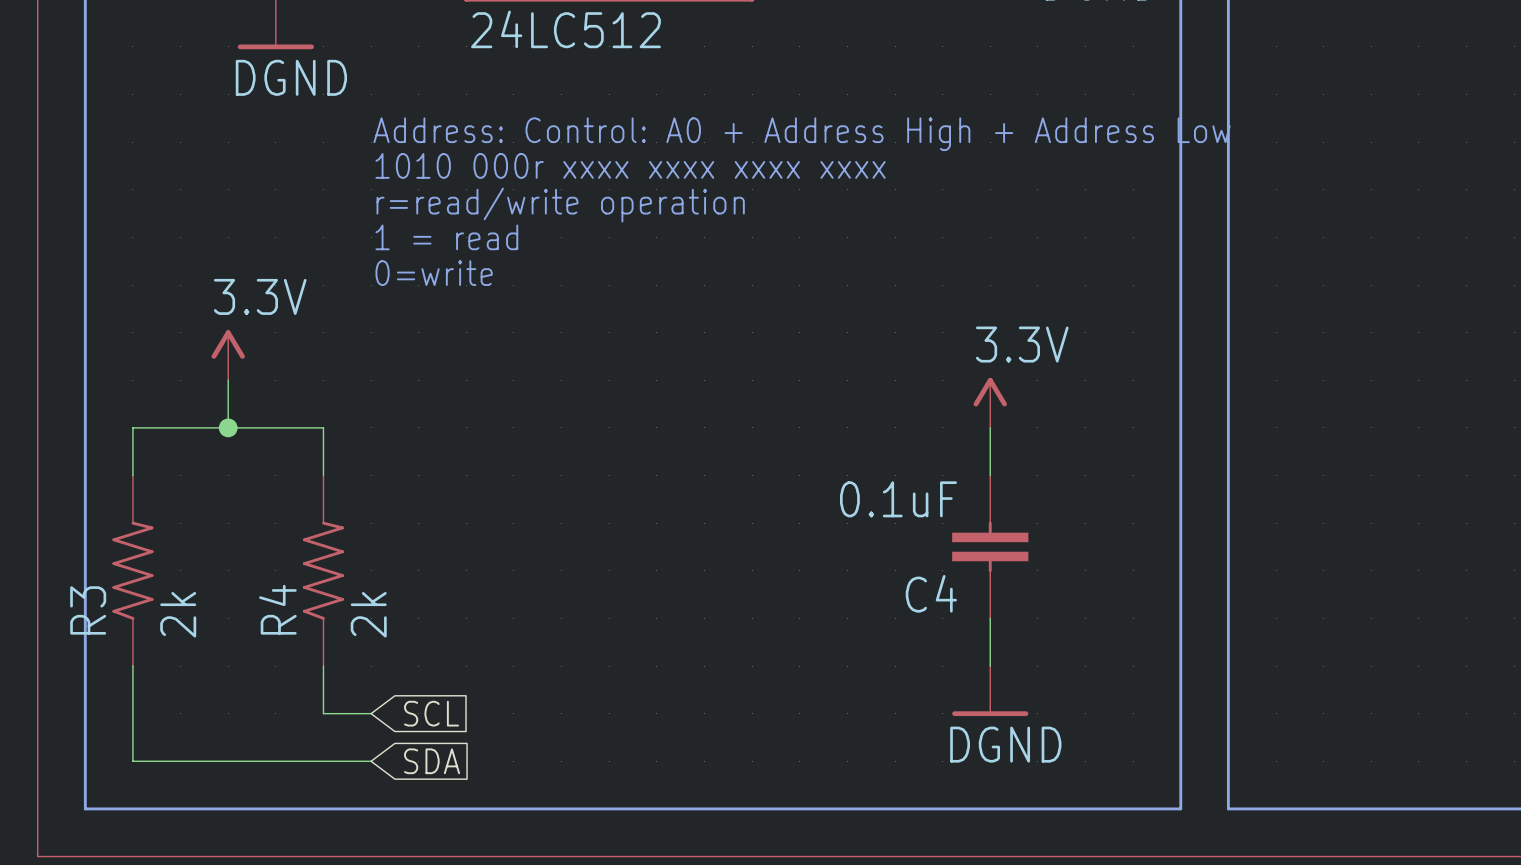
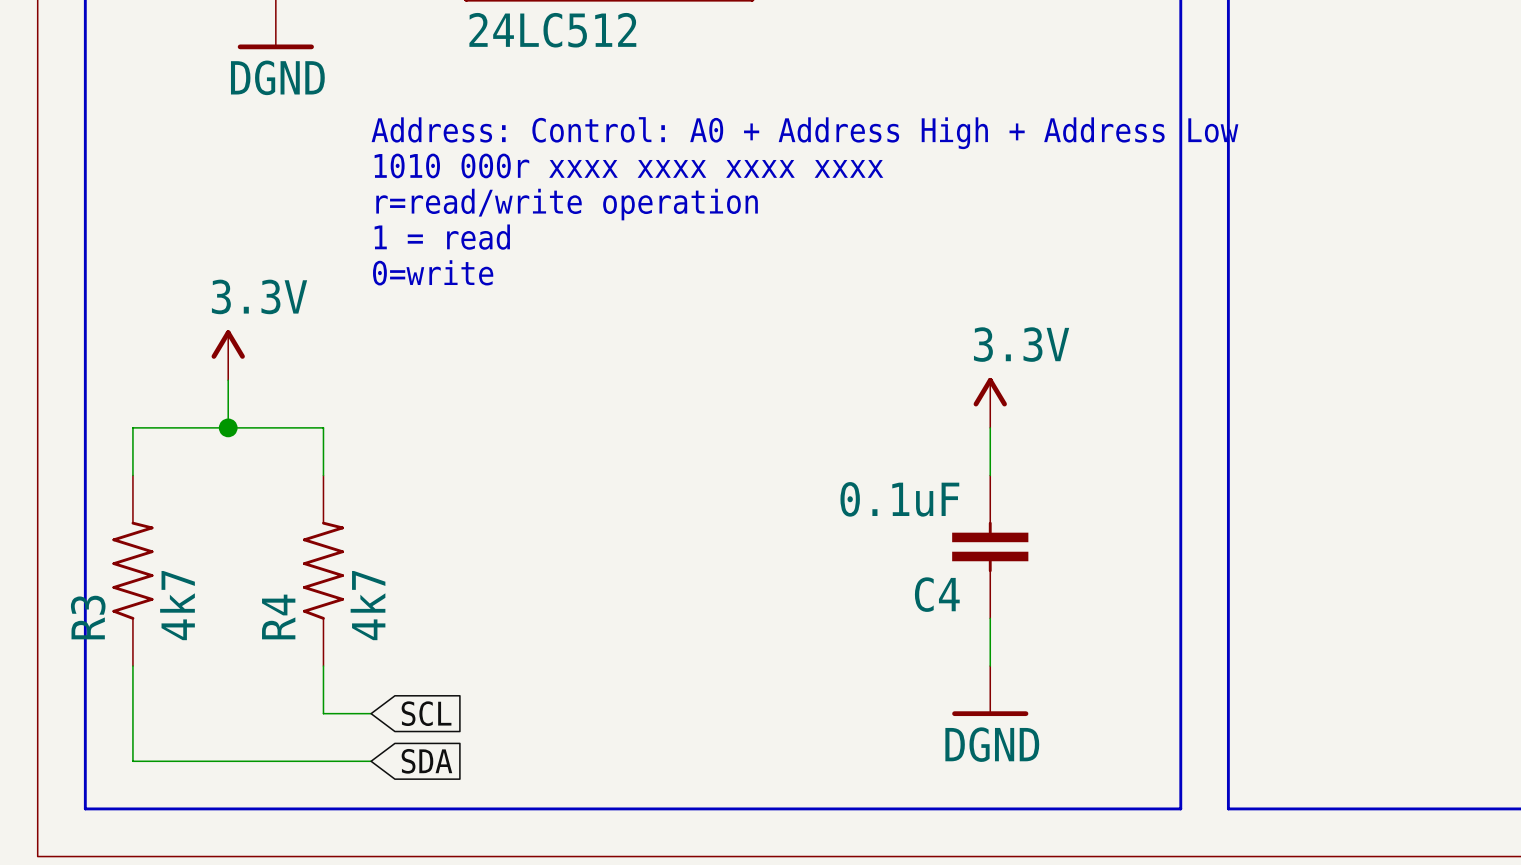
R3 value: 2k (178, 614) -> 4k7 (177, 605)
R4 value: 2k (368, 614) -> 4k7 (368, 605)

